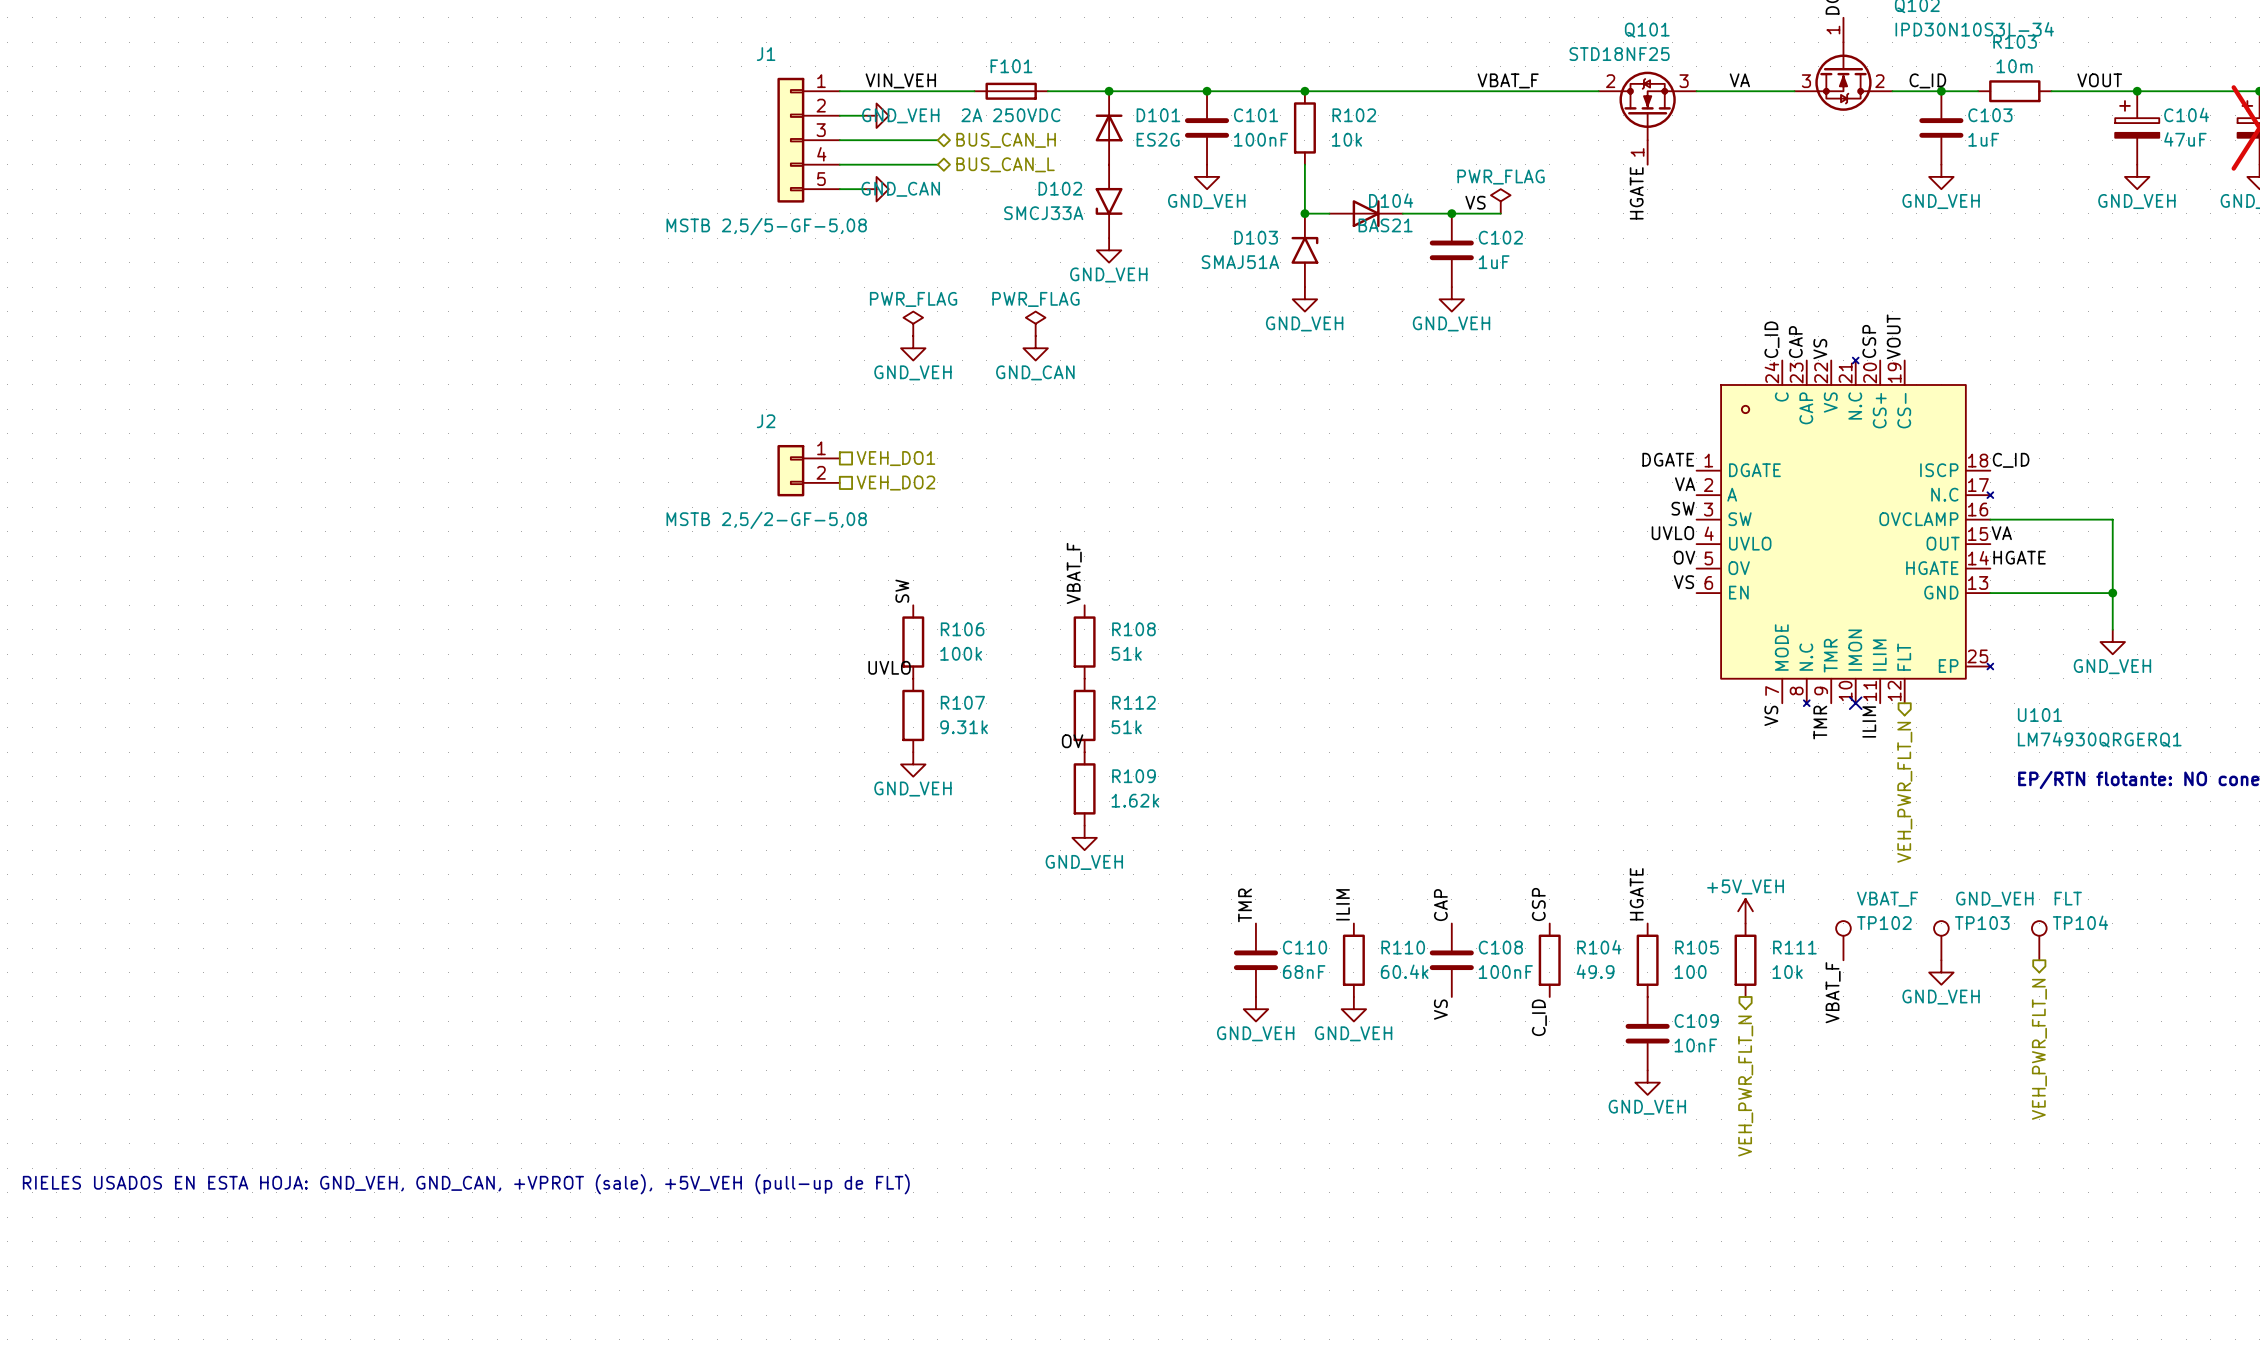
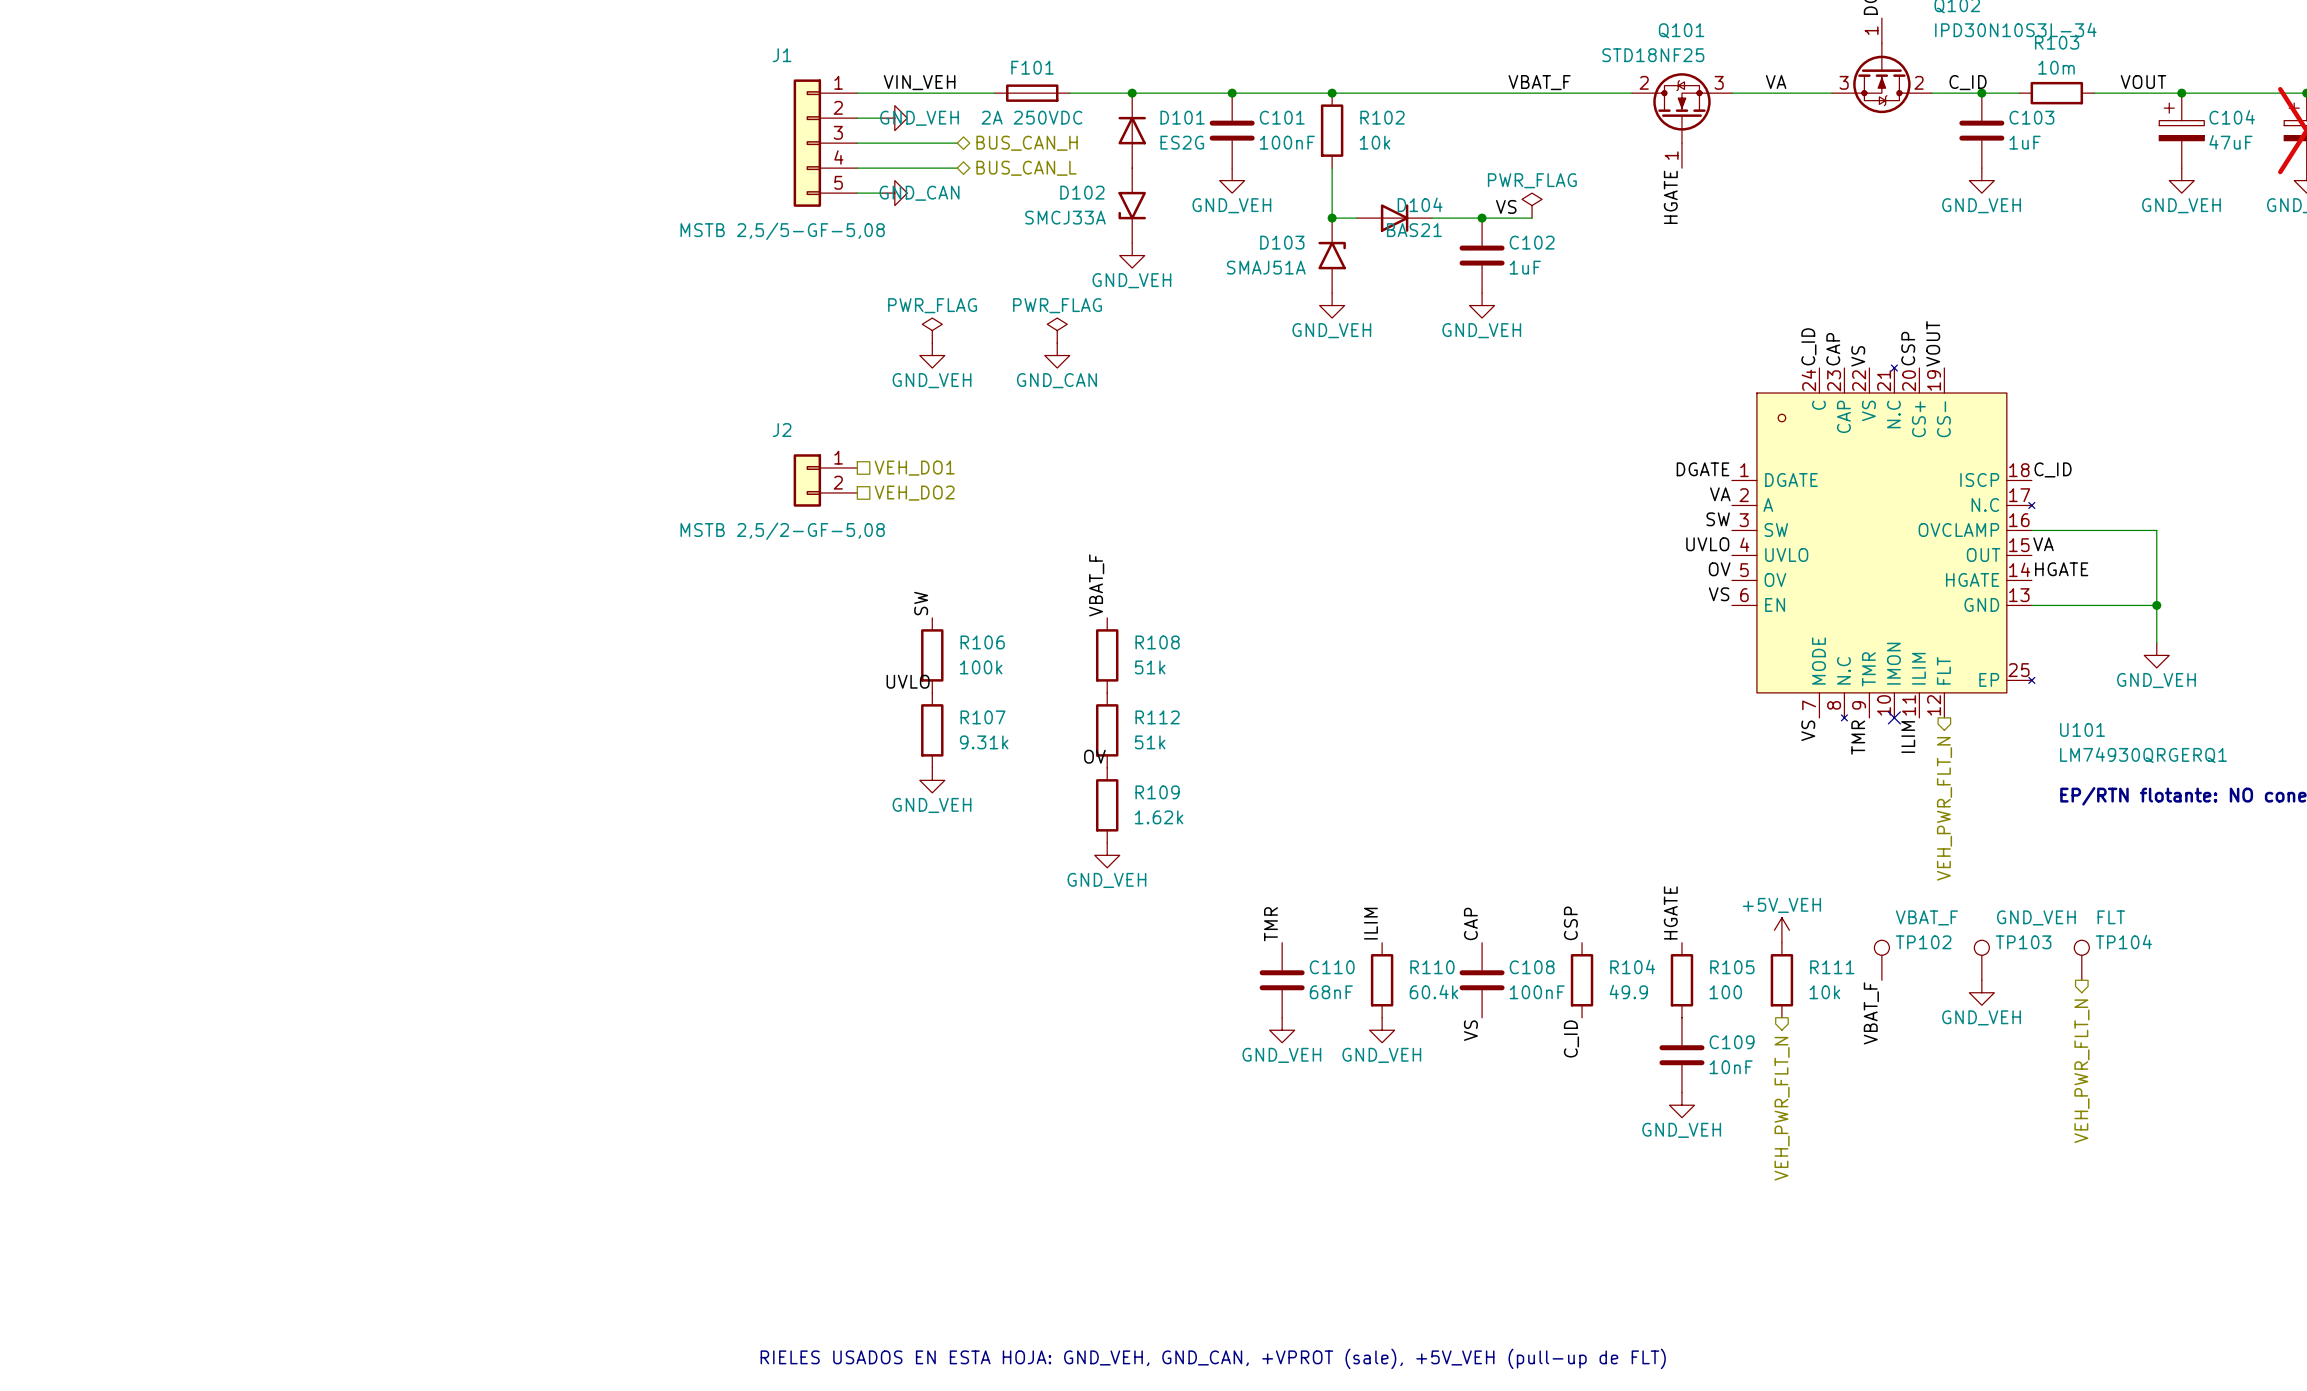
text: RIELES USADOS EN ESTA HOJA: GND_VEH, GND_CAN, +VPROT (sale), +5V_VEH (pull-up de FLT) (466, 1184) -> none
text: none -> RIELES USADOS EN ESTA HOJA: GND_VEH, GND_CAN, +VPROT (sale), +5V_VEH (pull-up de FLT) (1213, 1358)

